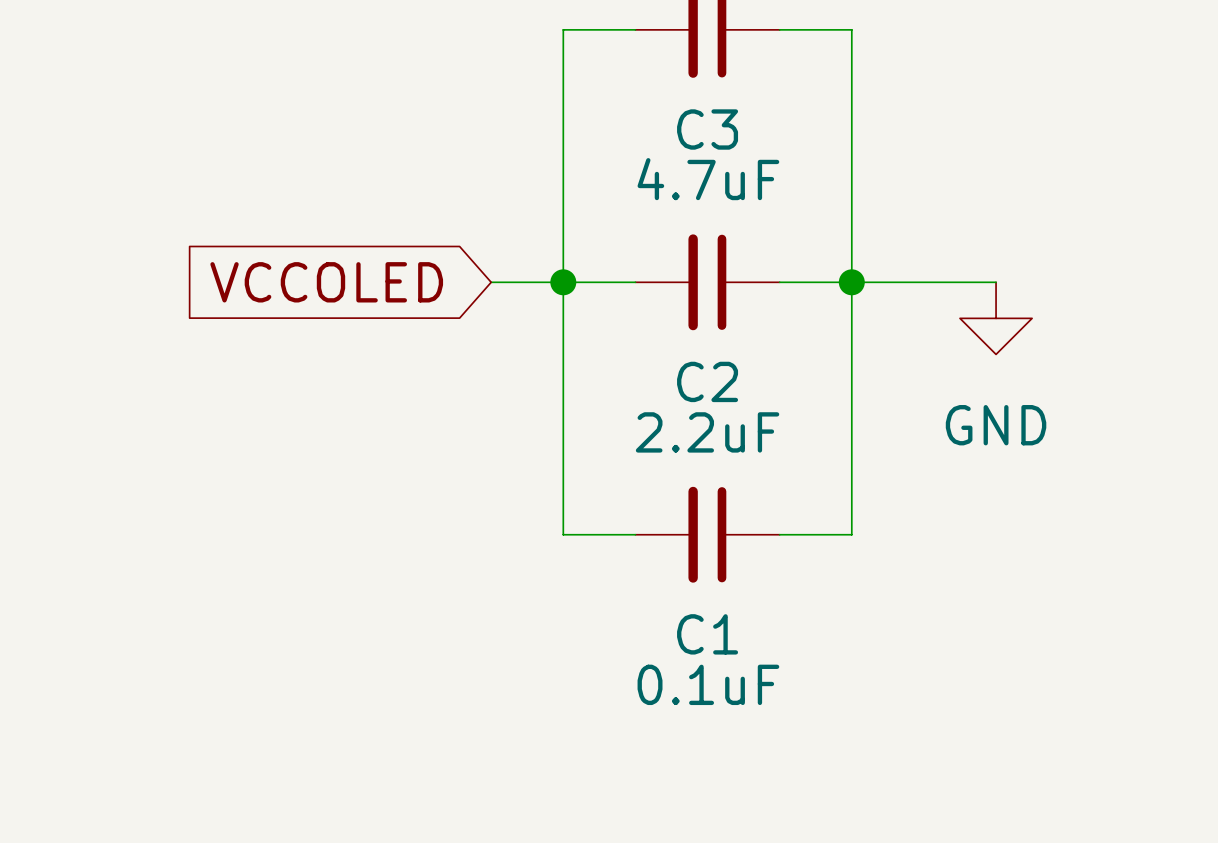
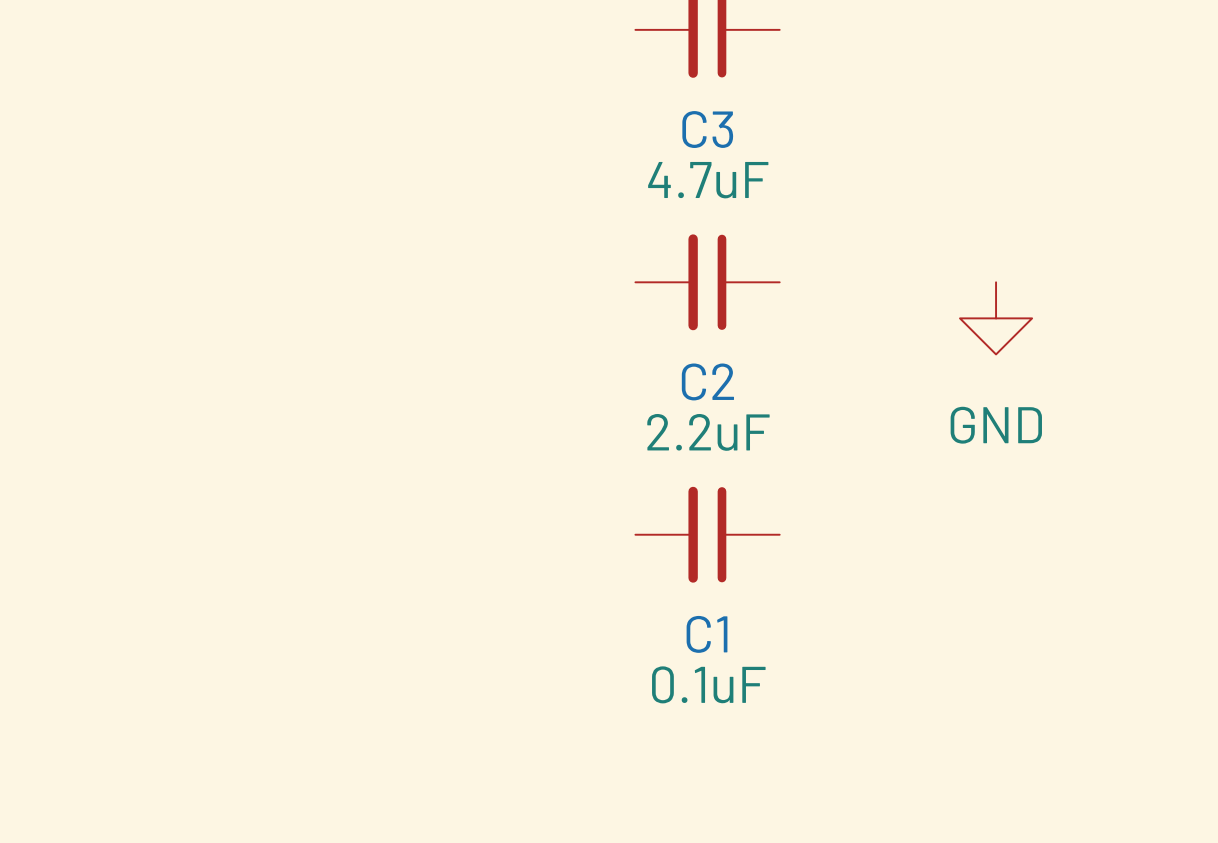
wire: (635, 29) (563, 29) (563, 534) (635, 534) -> none
wire: (779, 29) (851, 29) (851, 534) (779, 534) -> none
global label: VCCOLED (326, 282) -> none
wire: (491, 282) (635, 282) -> none
junction: (563, 282) -> none
wire: (779, 282) (996, 282) -> none
junction: (851, 282) -> none

